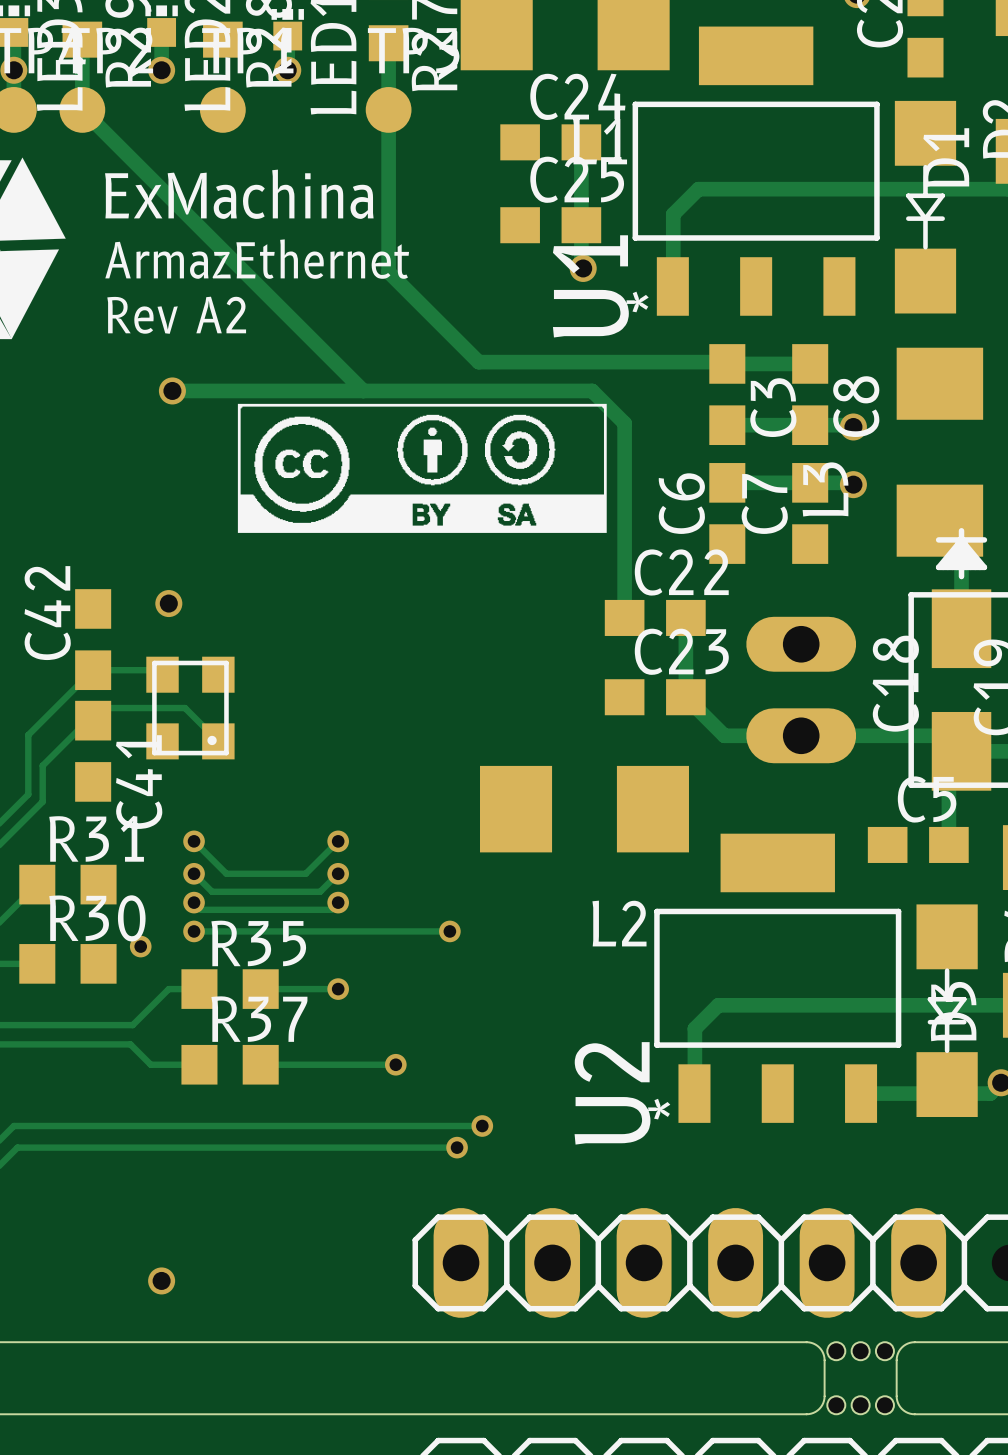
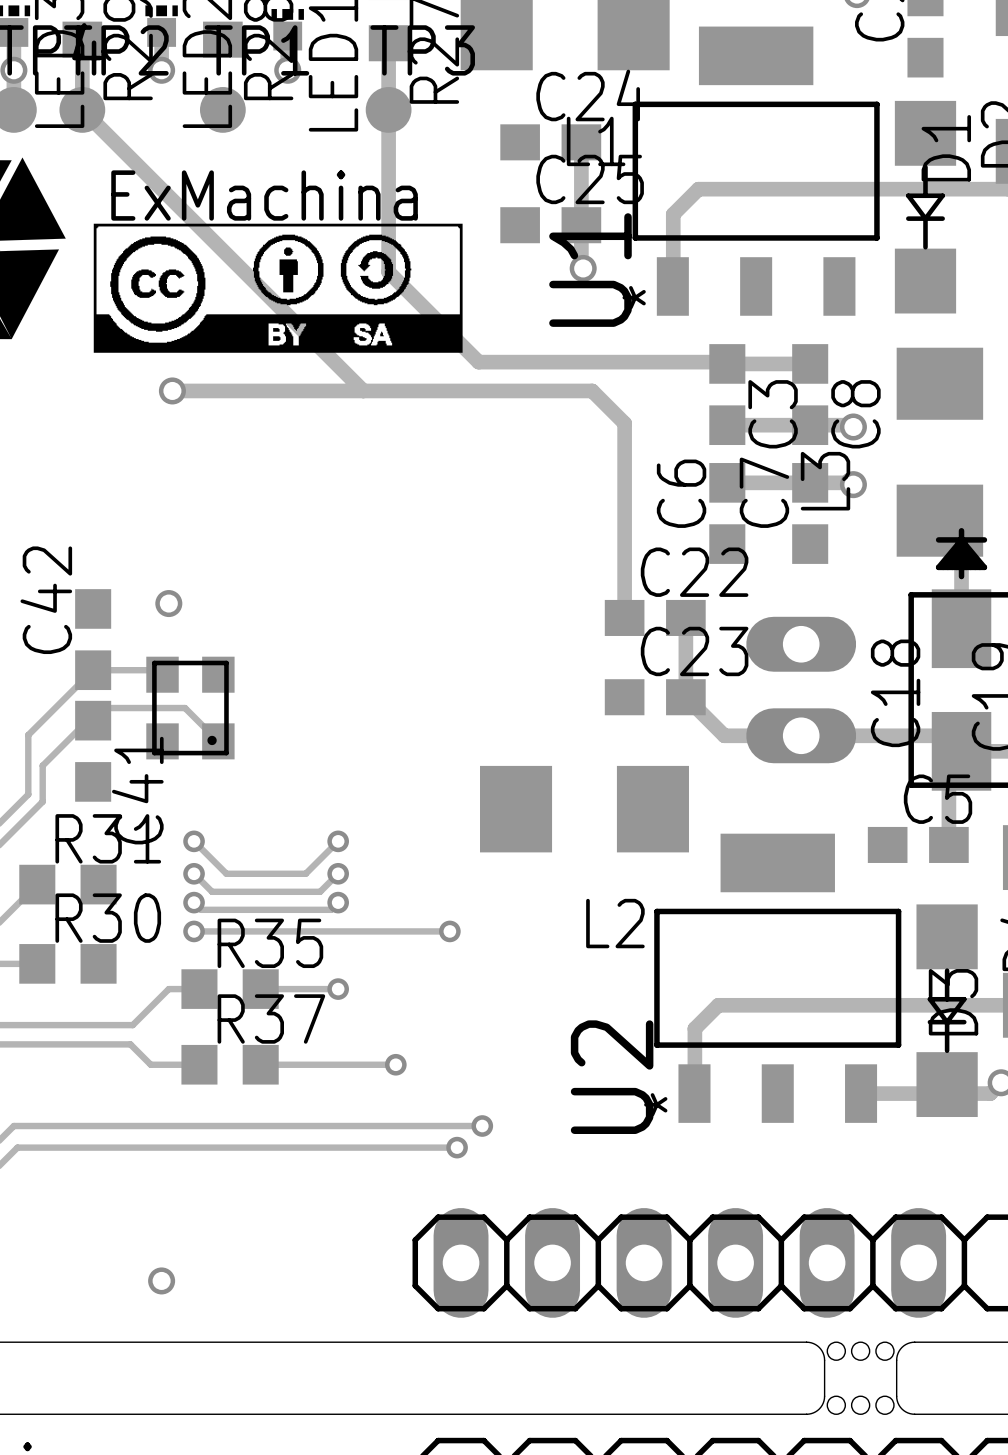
text: ArmazEthernet (257, 259) -> none
text: Rev A2 (176, 315) -> none
drawing position: (422, 468) -> (278, 288)
via: (140, 946) -> none

